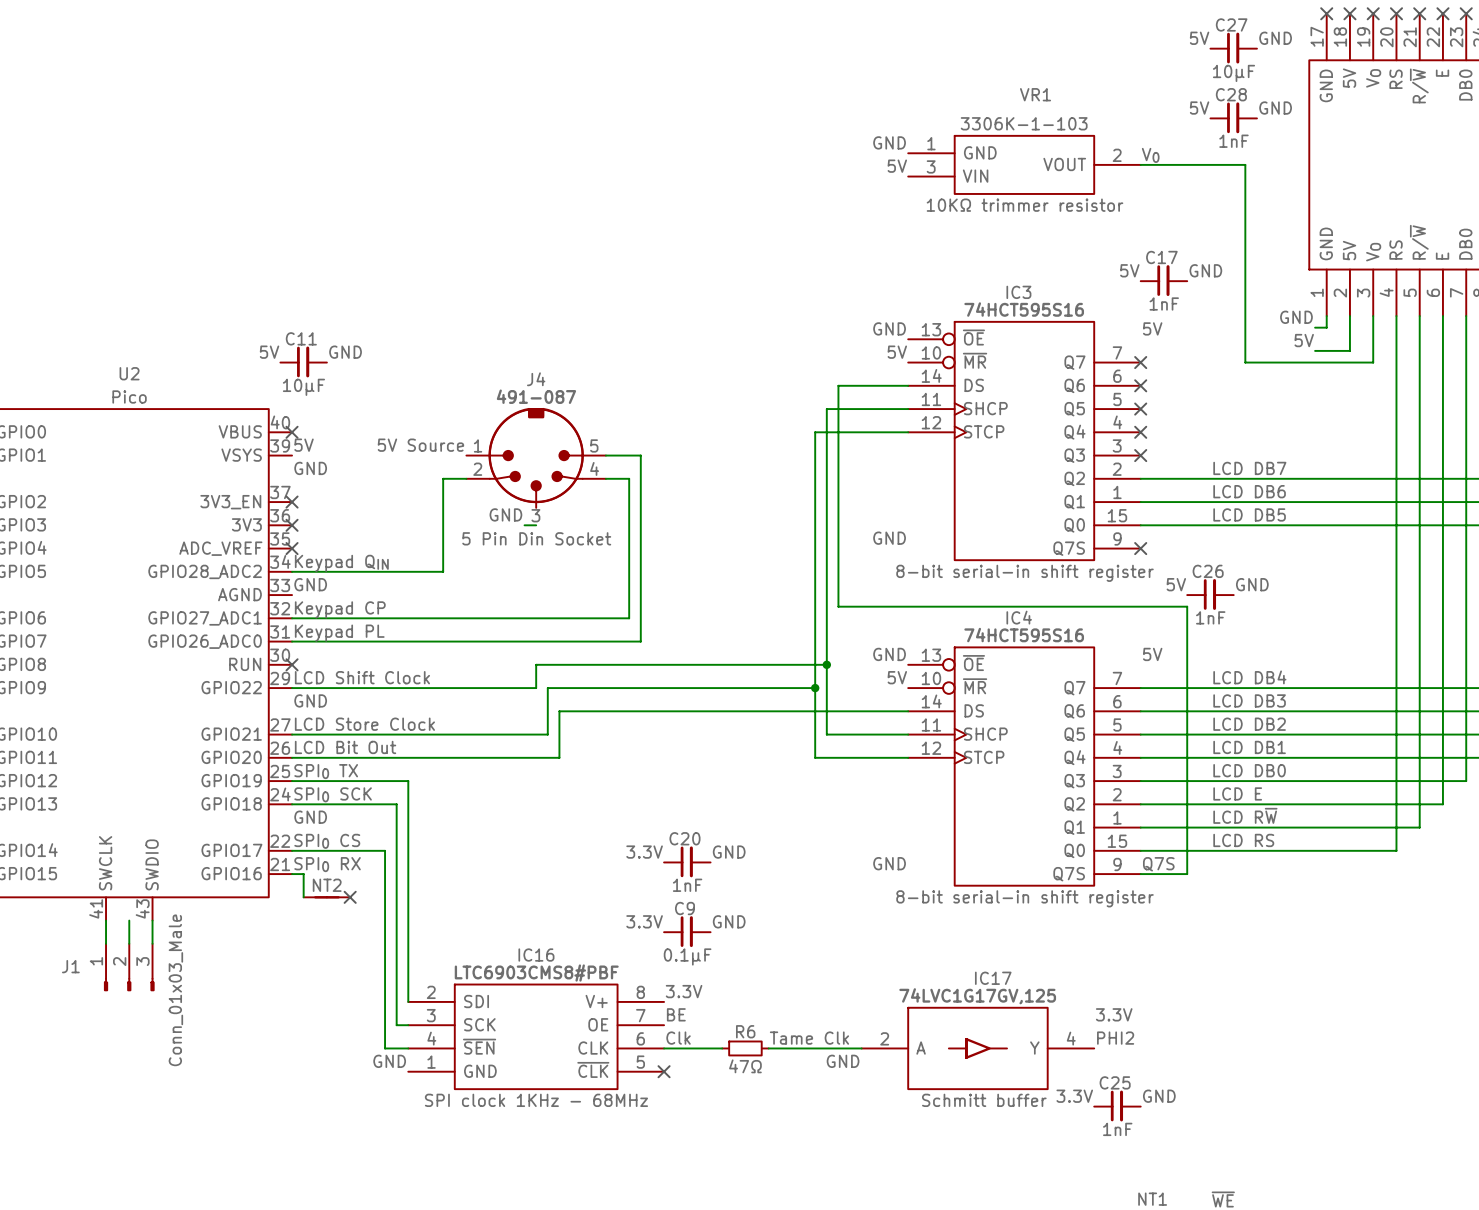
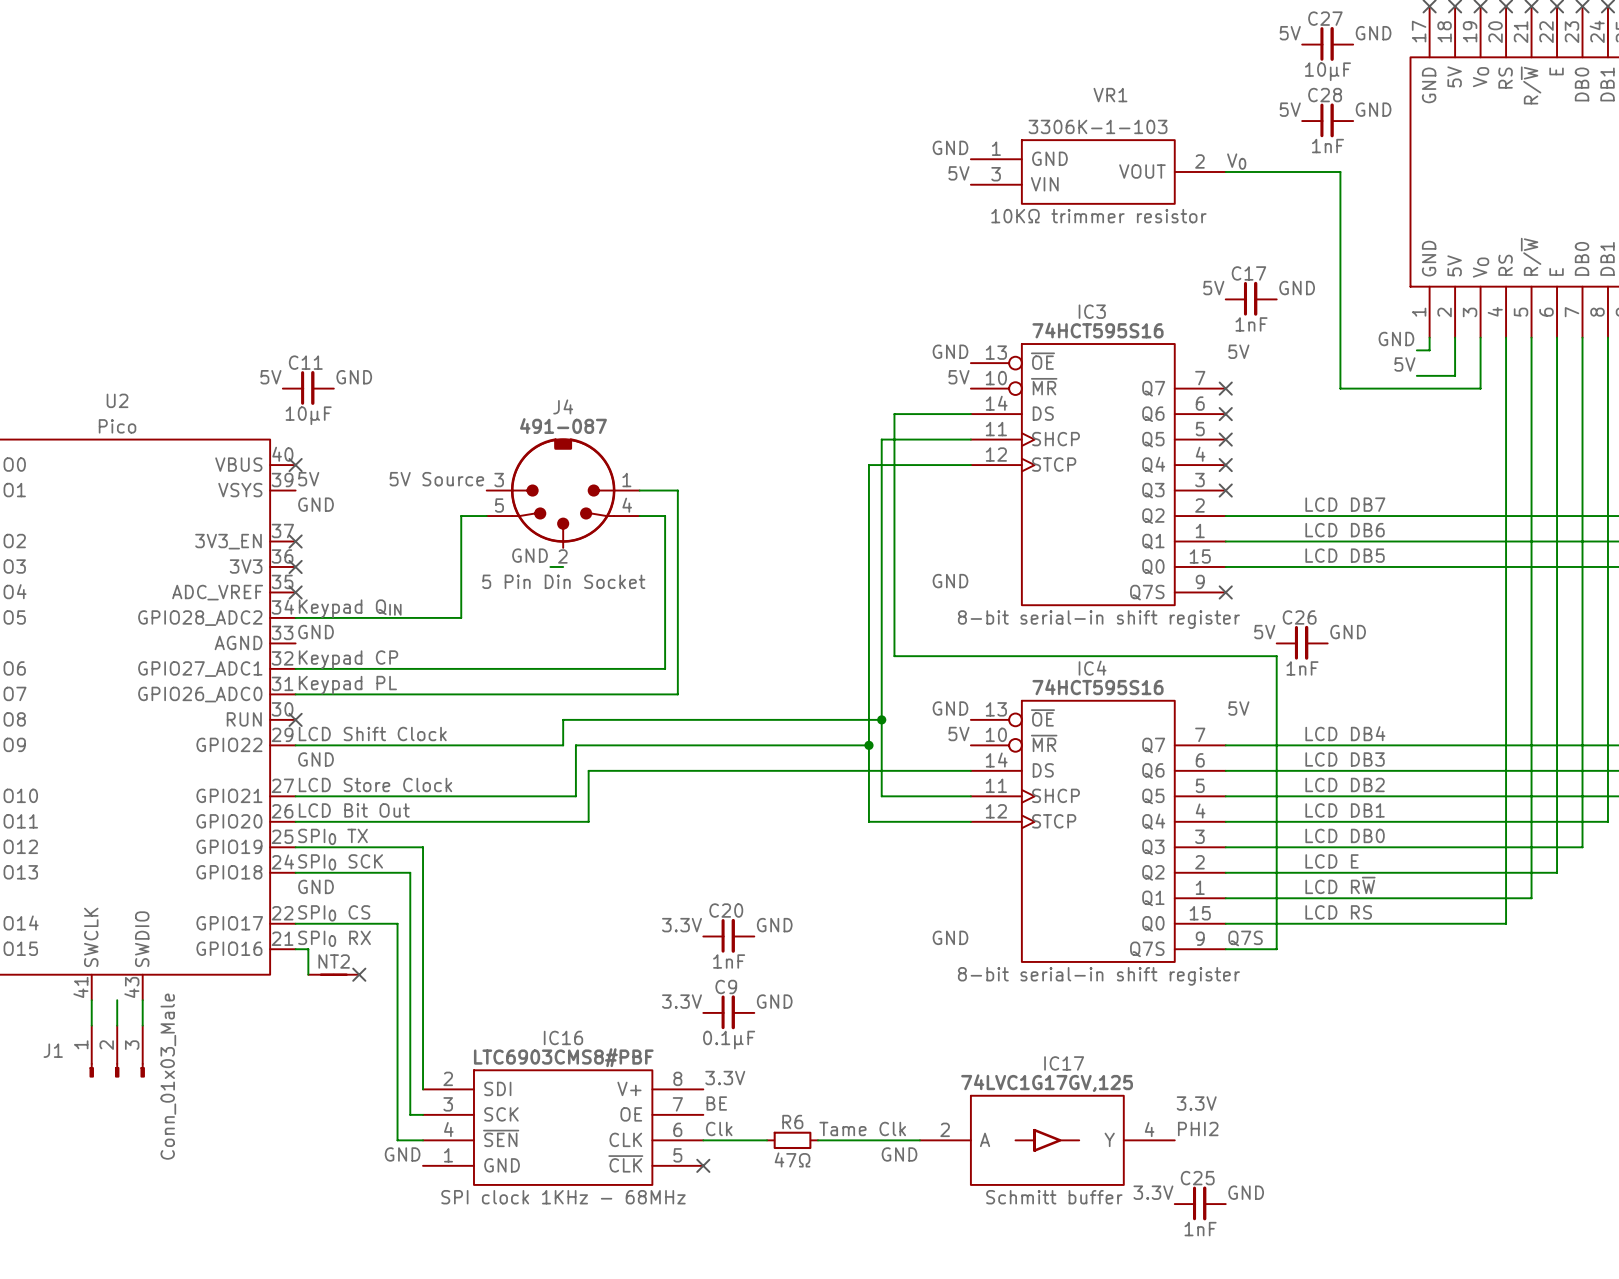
J4 pin number: 1 (478, 445) -> 3 (499, 480)
J4 pin number: 5 (594, 445) -> 1 (626, 480)
J4 pin number: 2 (477, 469) -> 5 (499, 505)
J4 pin number: 3 (535, 515) -> 2 (562, 556)

